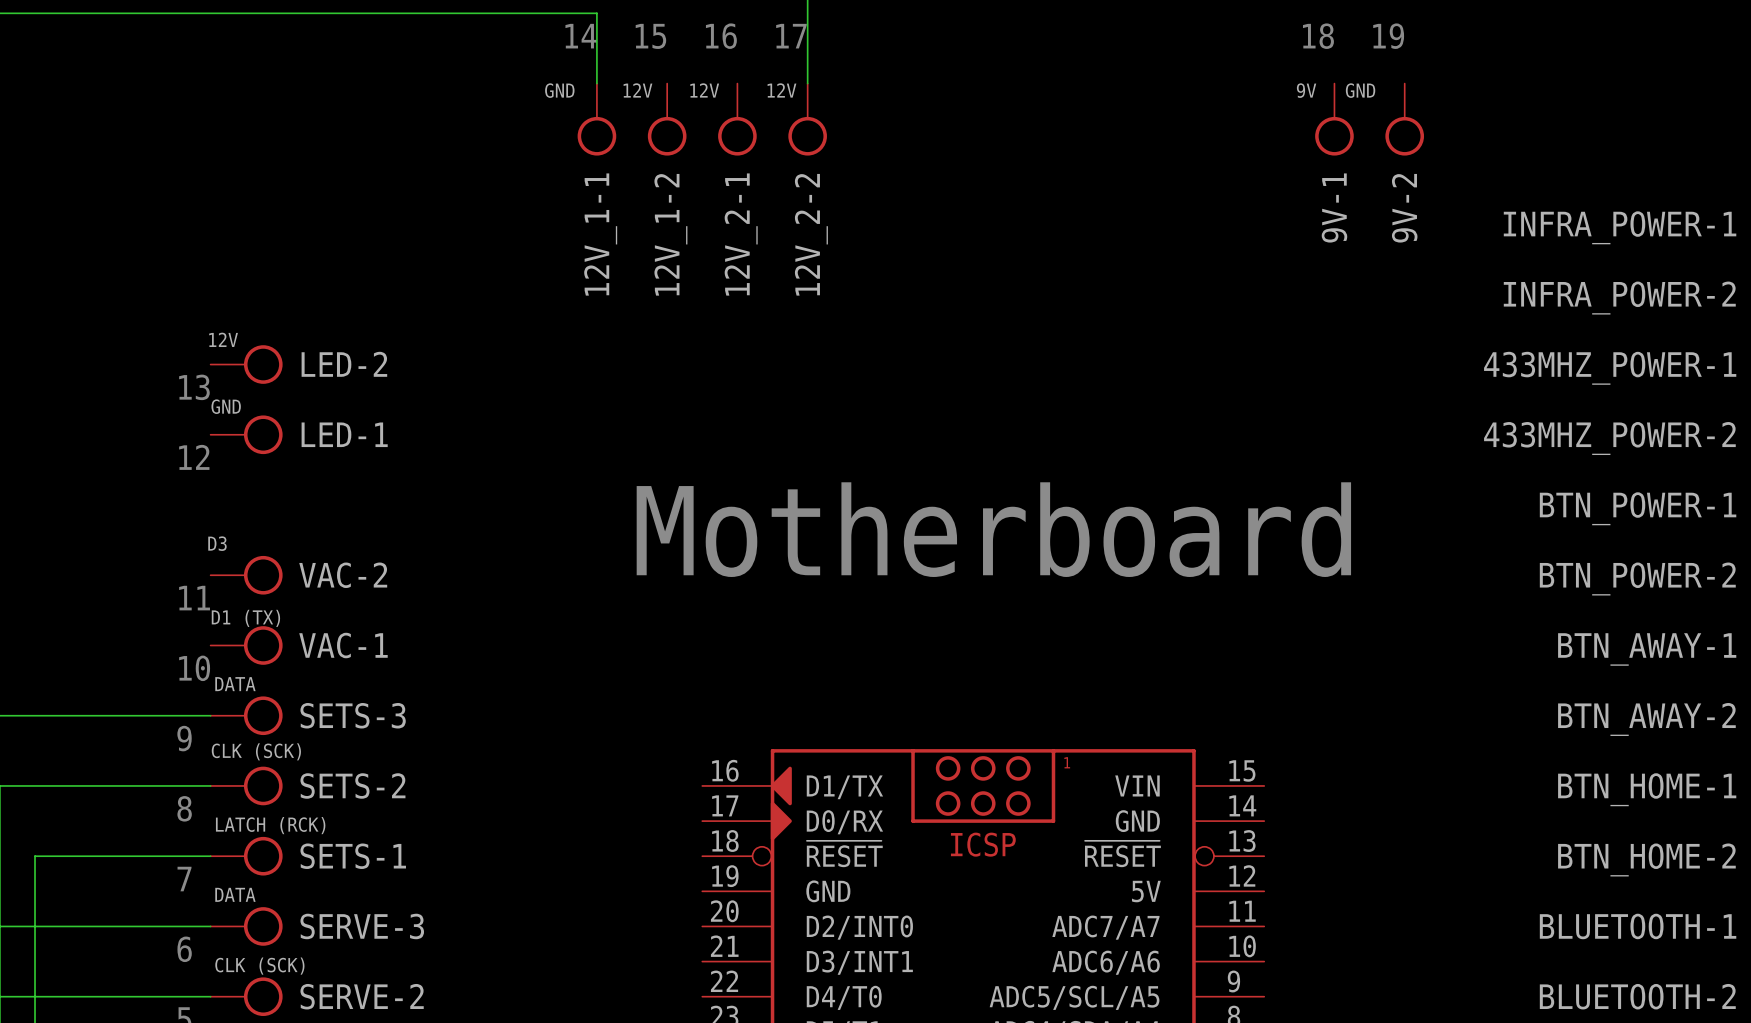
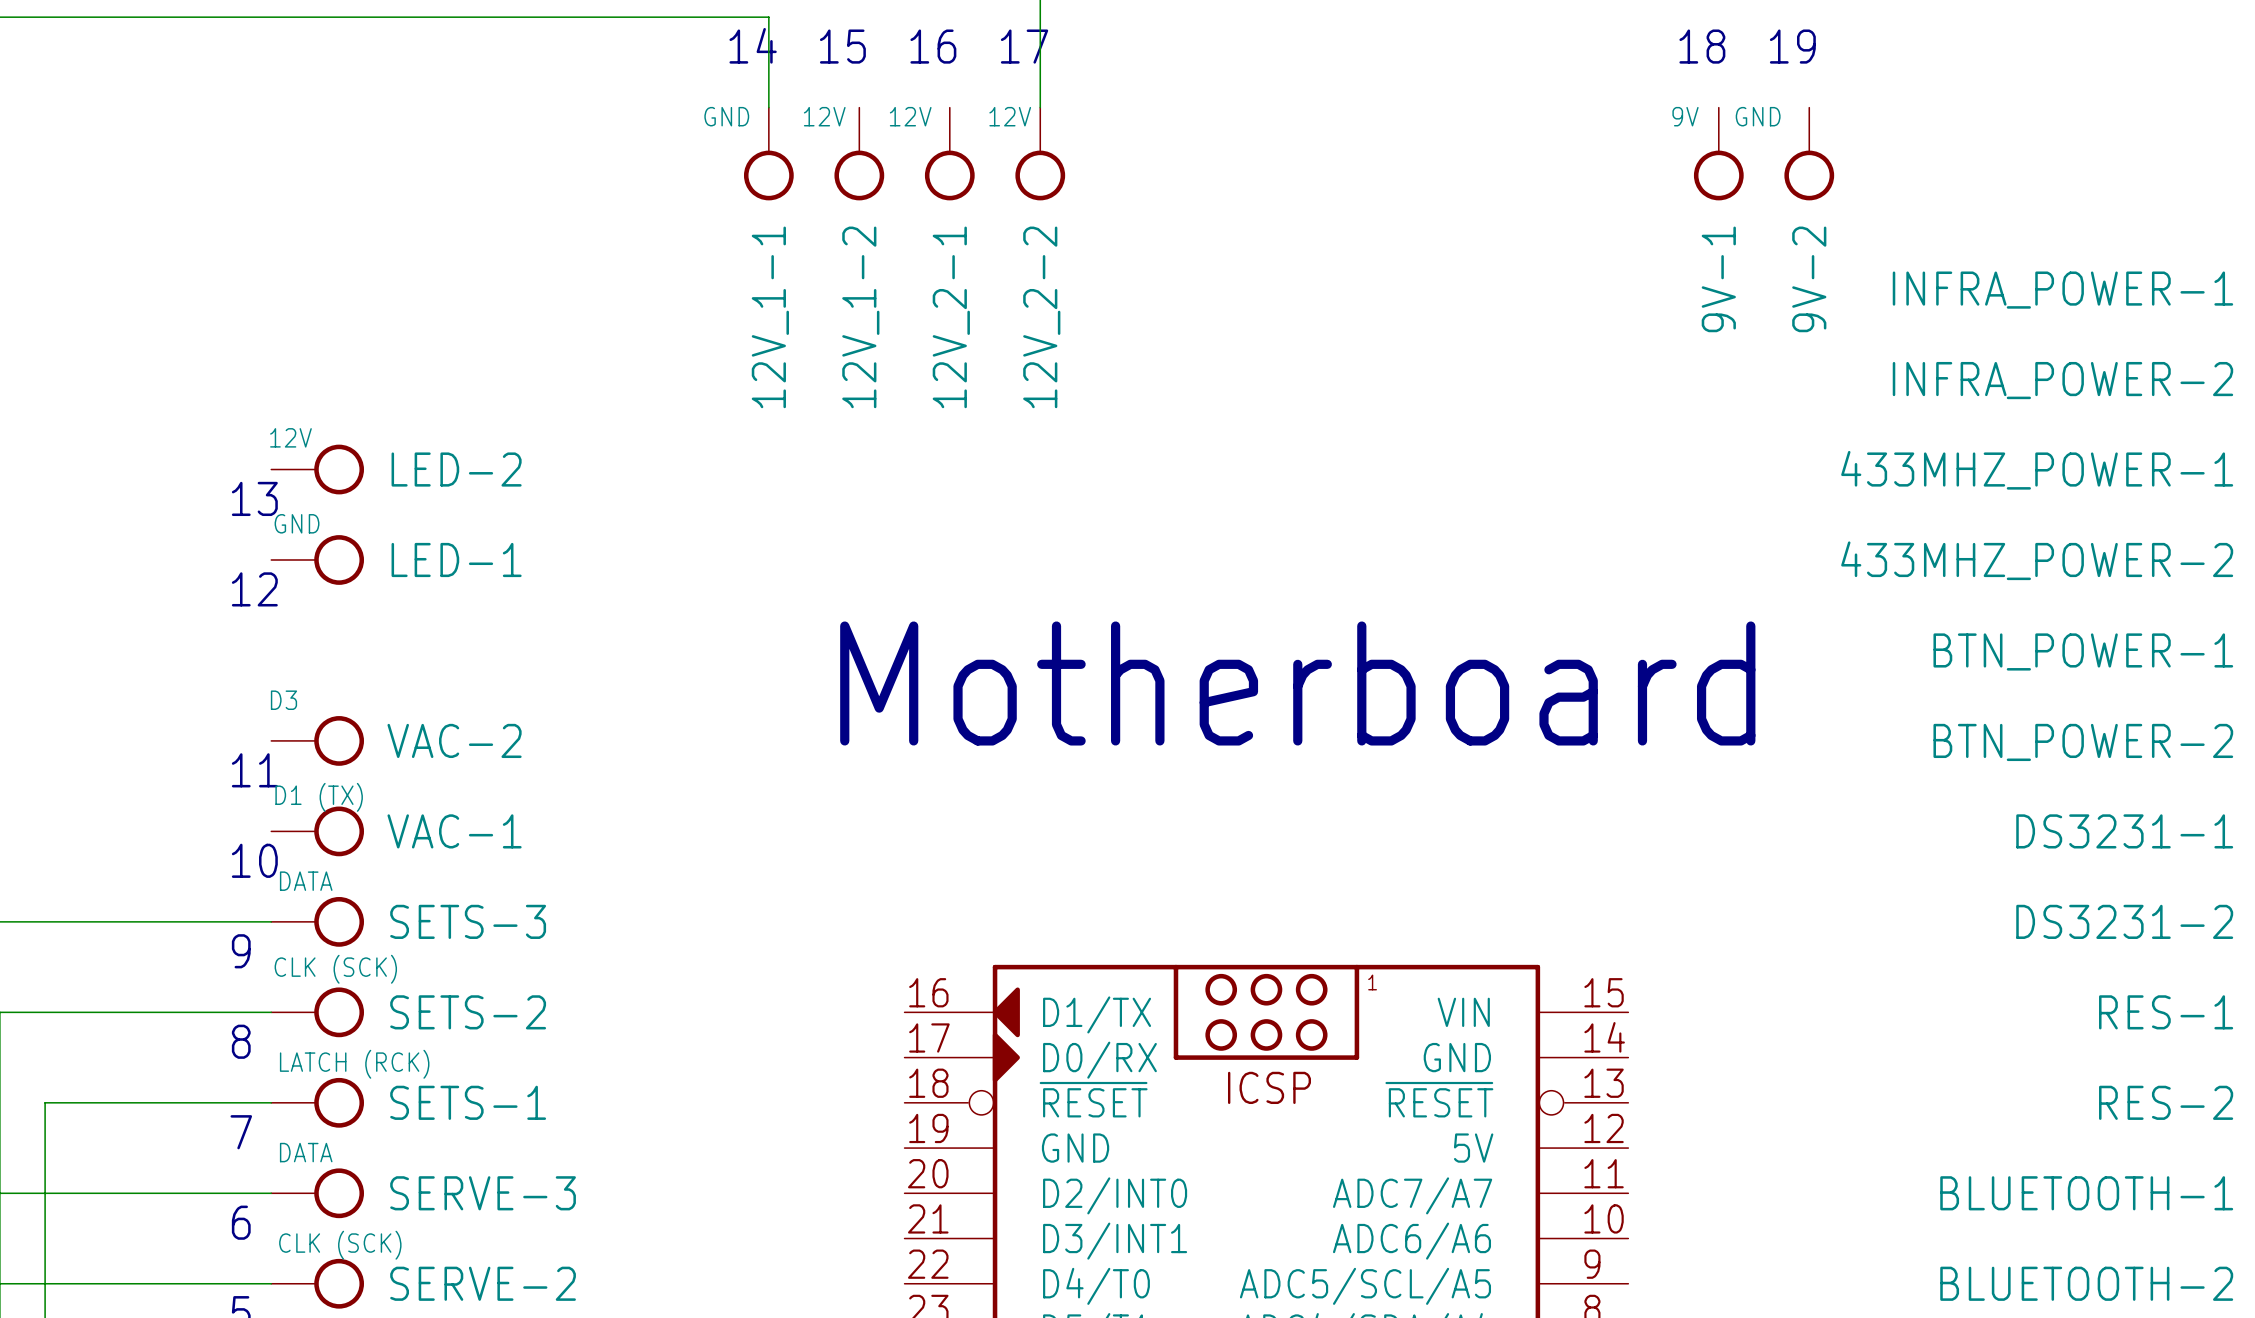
BTN_AWAY-1 name: BTN_AWAY-1 (1647, 649) -> DS3231-1 (2124, 831)
BTN_AWAY-2 name: BTN_AWAY-2 (1646, 719) -> DS3231-2 (2124, 921)
BTN_HOME-1 name: BTN_HOME-1 (1647, 789) -> RES-1 (2166, 1012)
BTN_HOME-2 name: BTN_HOME-2 (1646, 859) -> RES-2 (2166, 1102)

